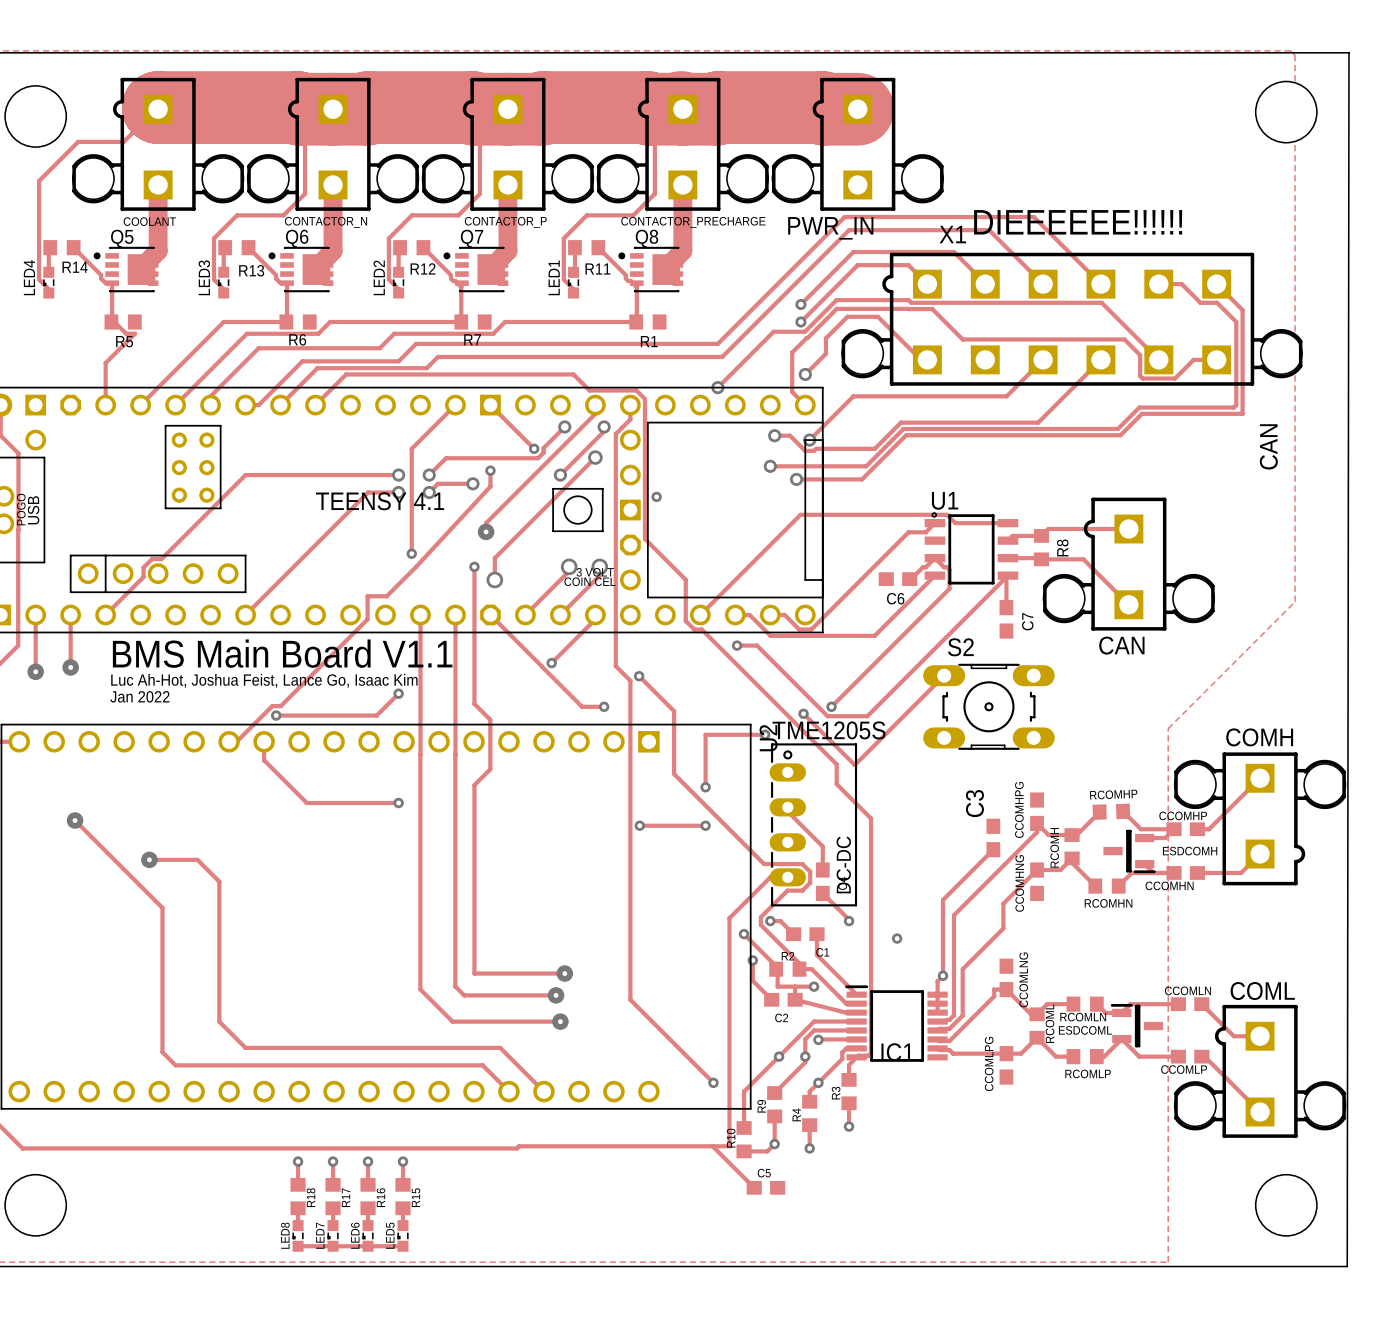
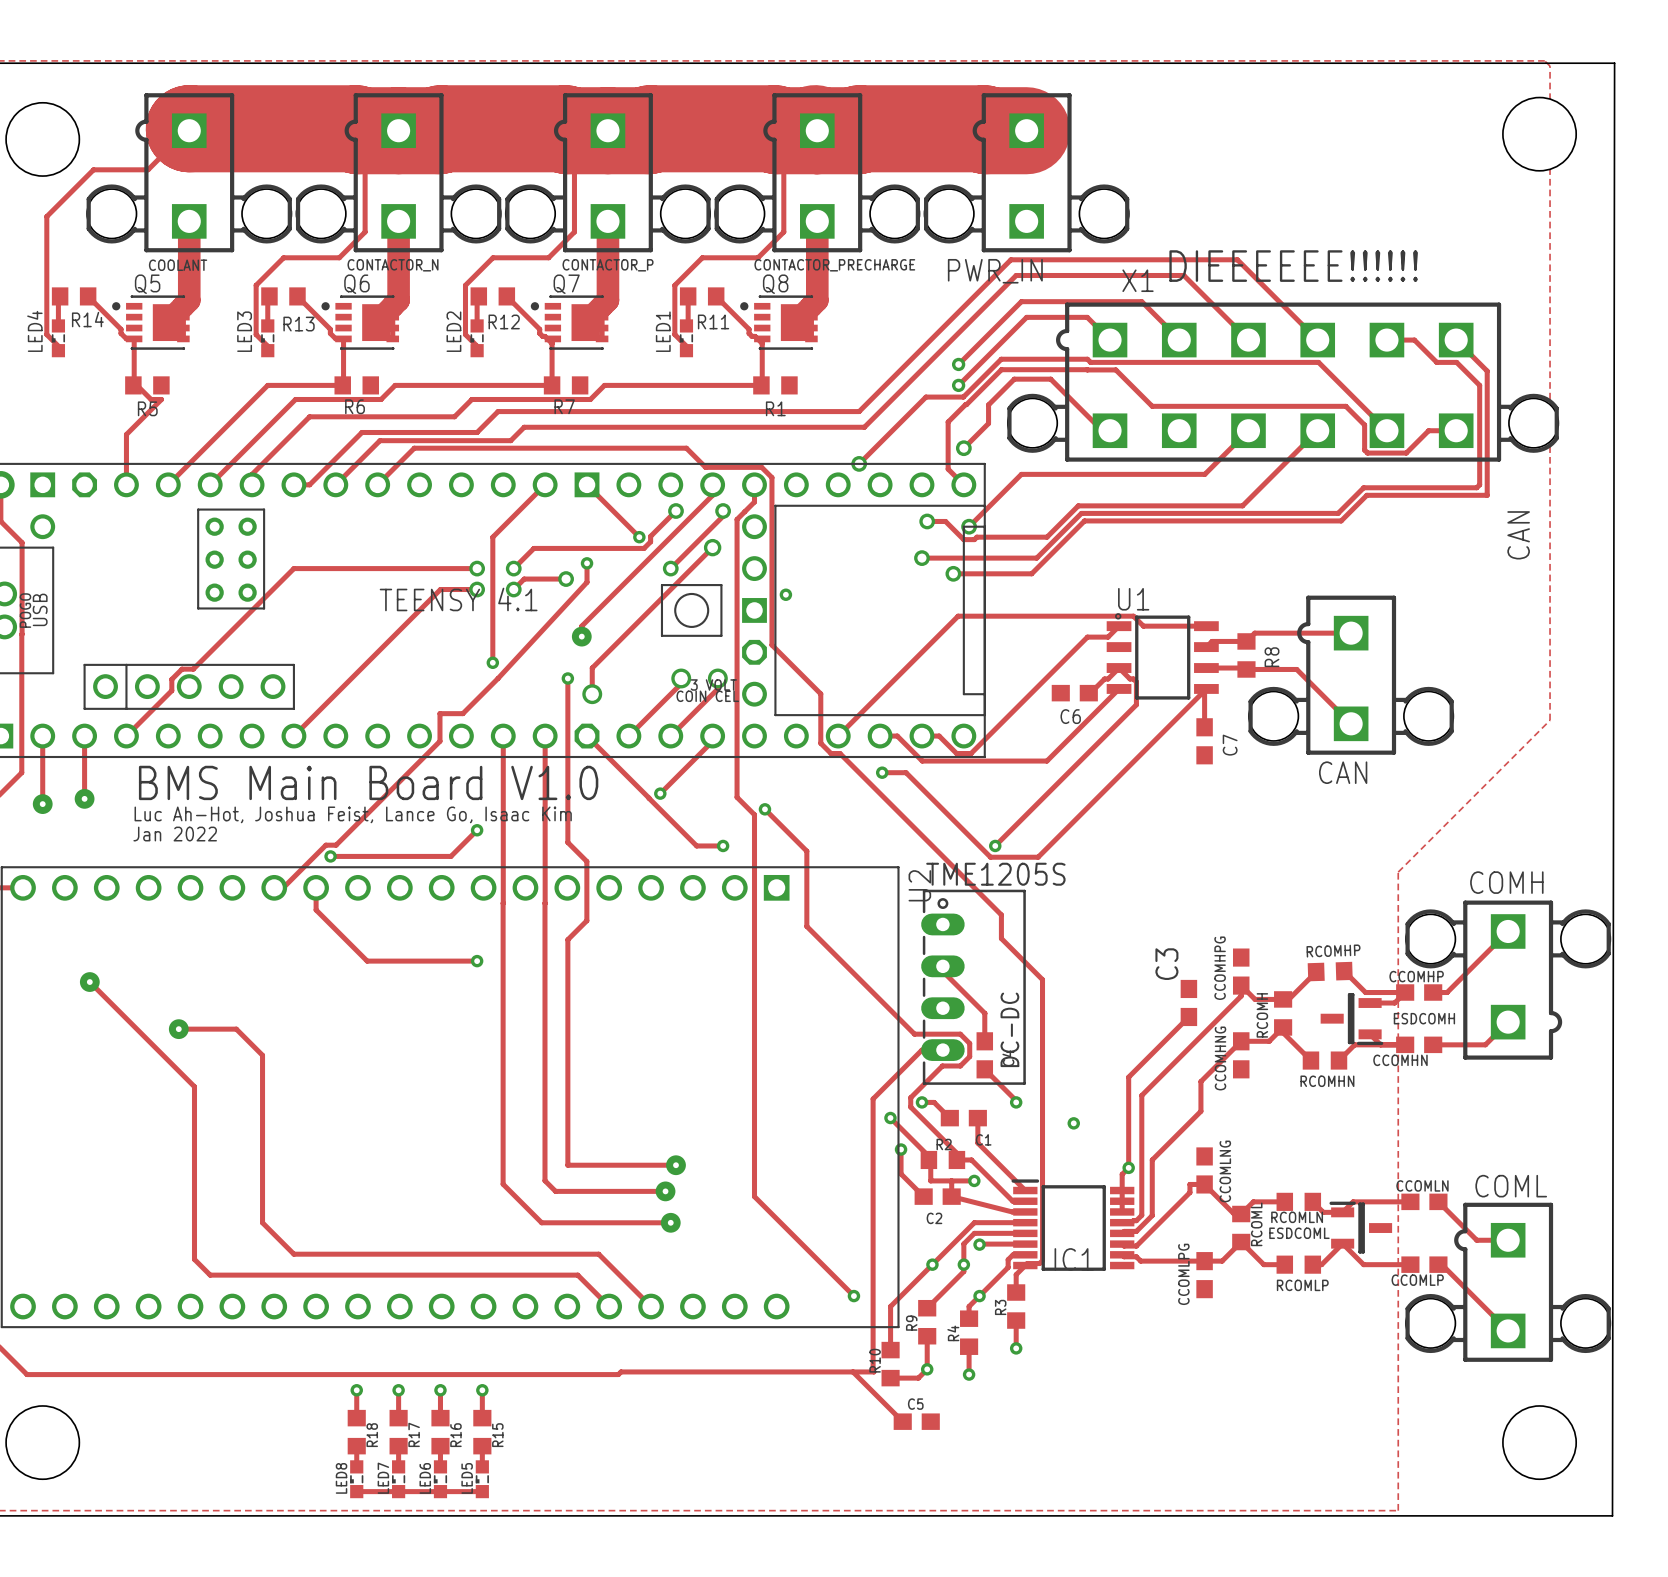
text: BMS Main Board V1.1 (282, 653) -> BMS Main Board V1.0 (368, 782)
track: (944, 675) (854, 765) (803, 713) -> none
S2: (988, 706) -> none
via: (803, 713) -> none
track: (765, 734) (705, 734) (705, 787) -> none
via: (765, 734) -> none
via: (705, 787) -> none
track: (639, 825) (705, 825) -> none
via: (639, 825) -> none
via: (705, 825) -> none

